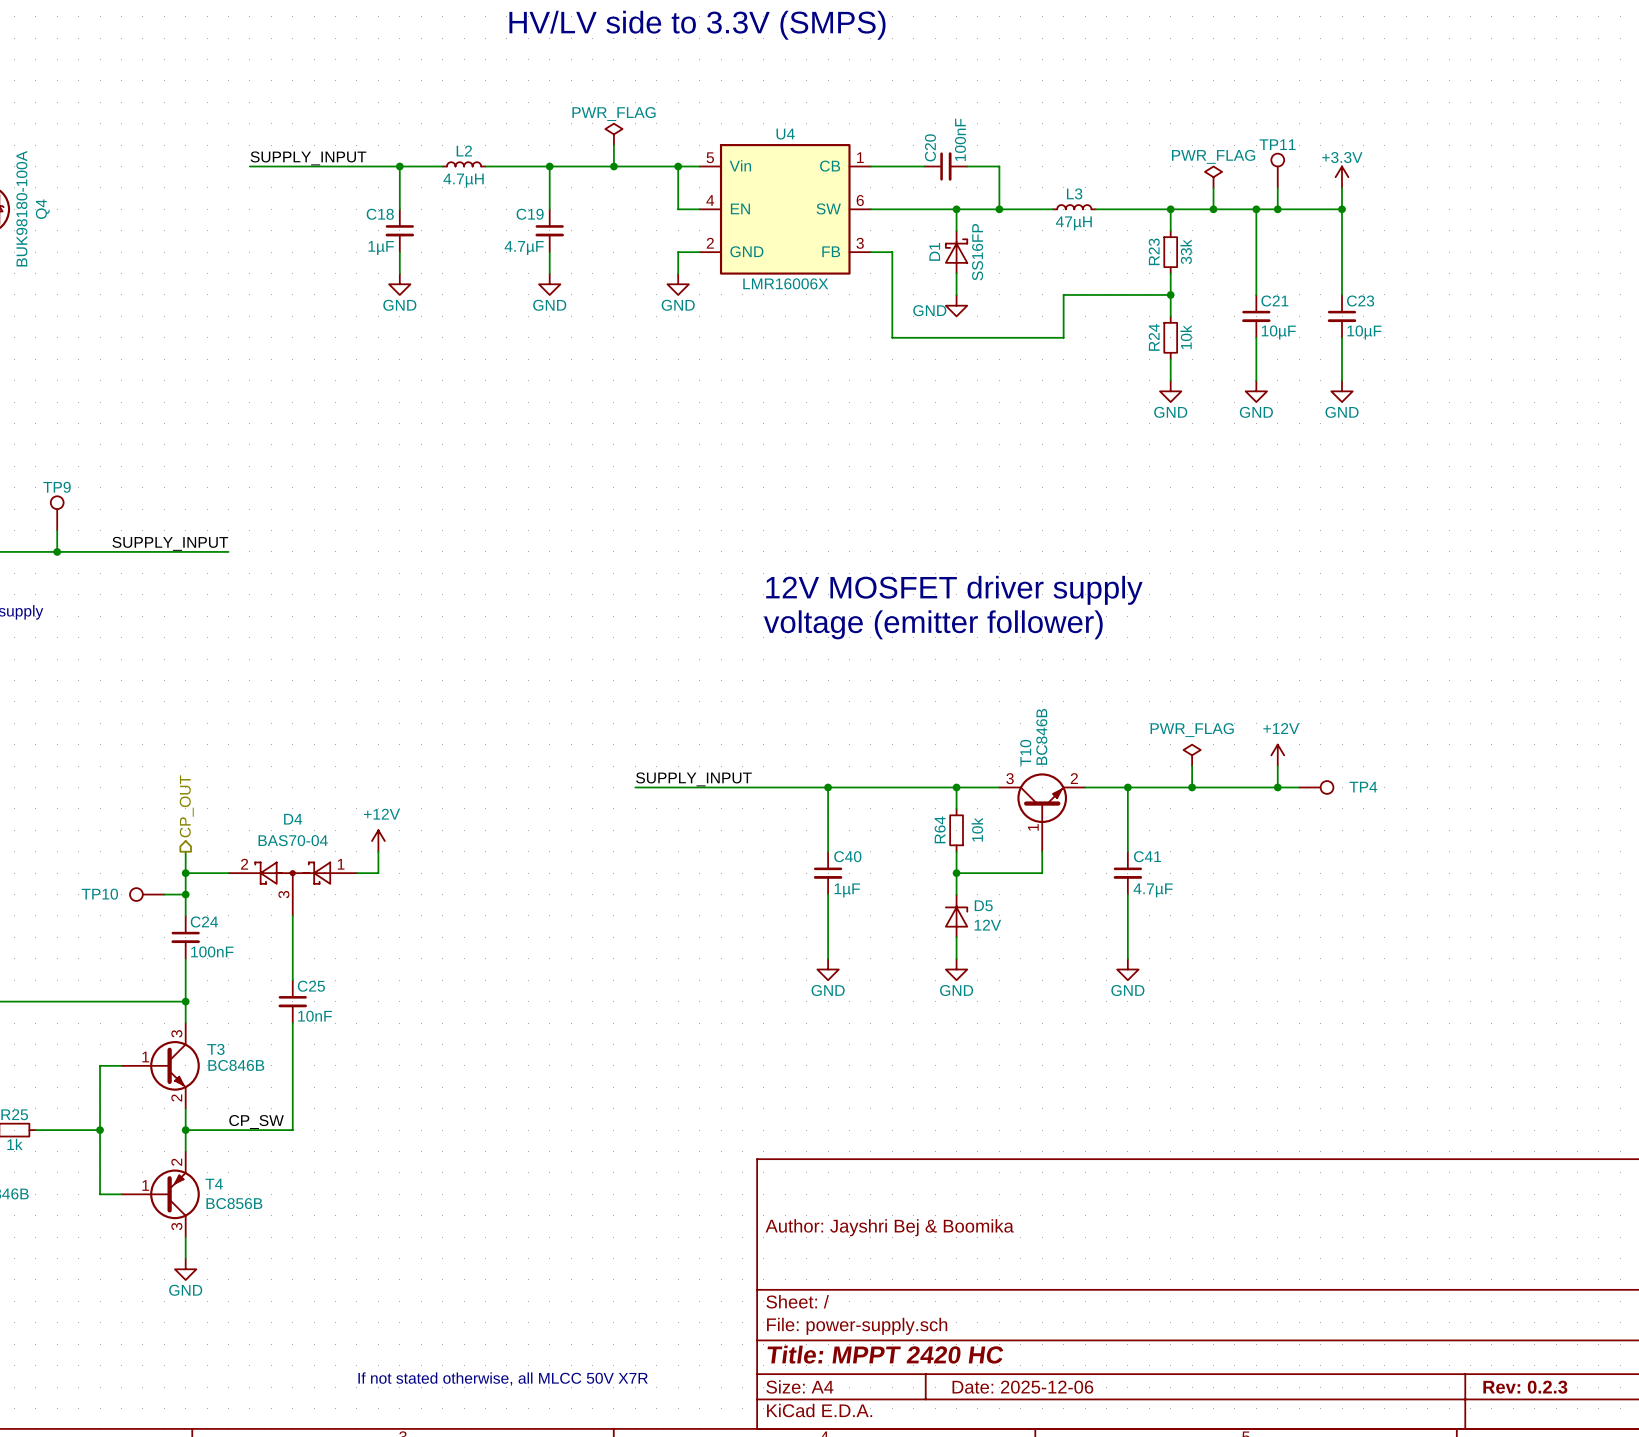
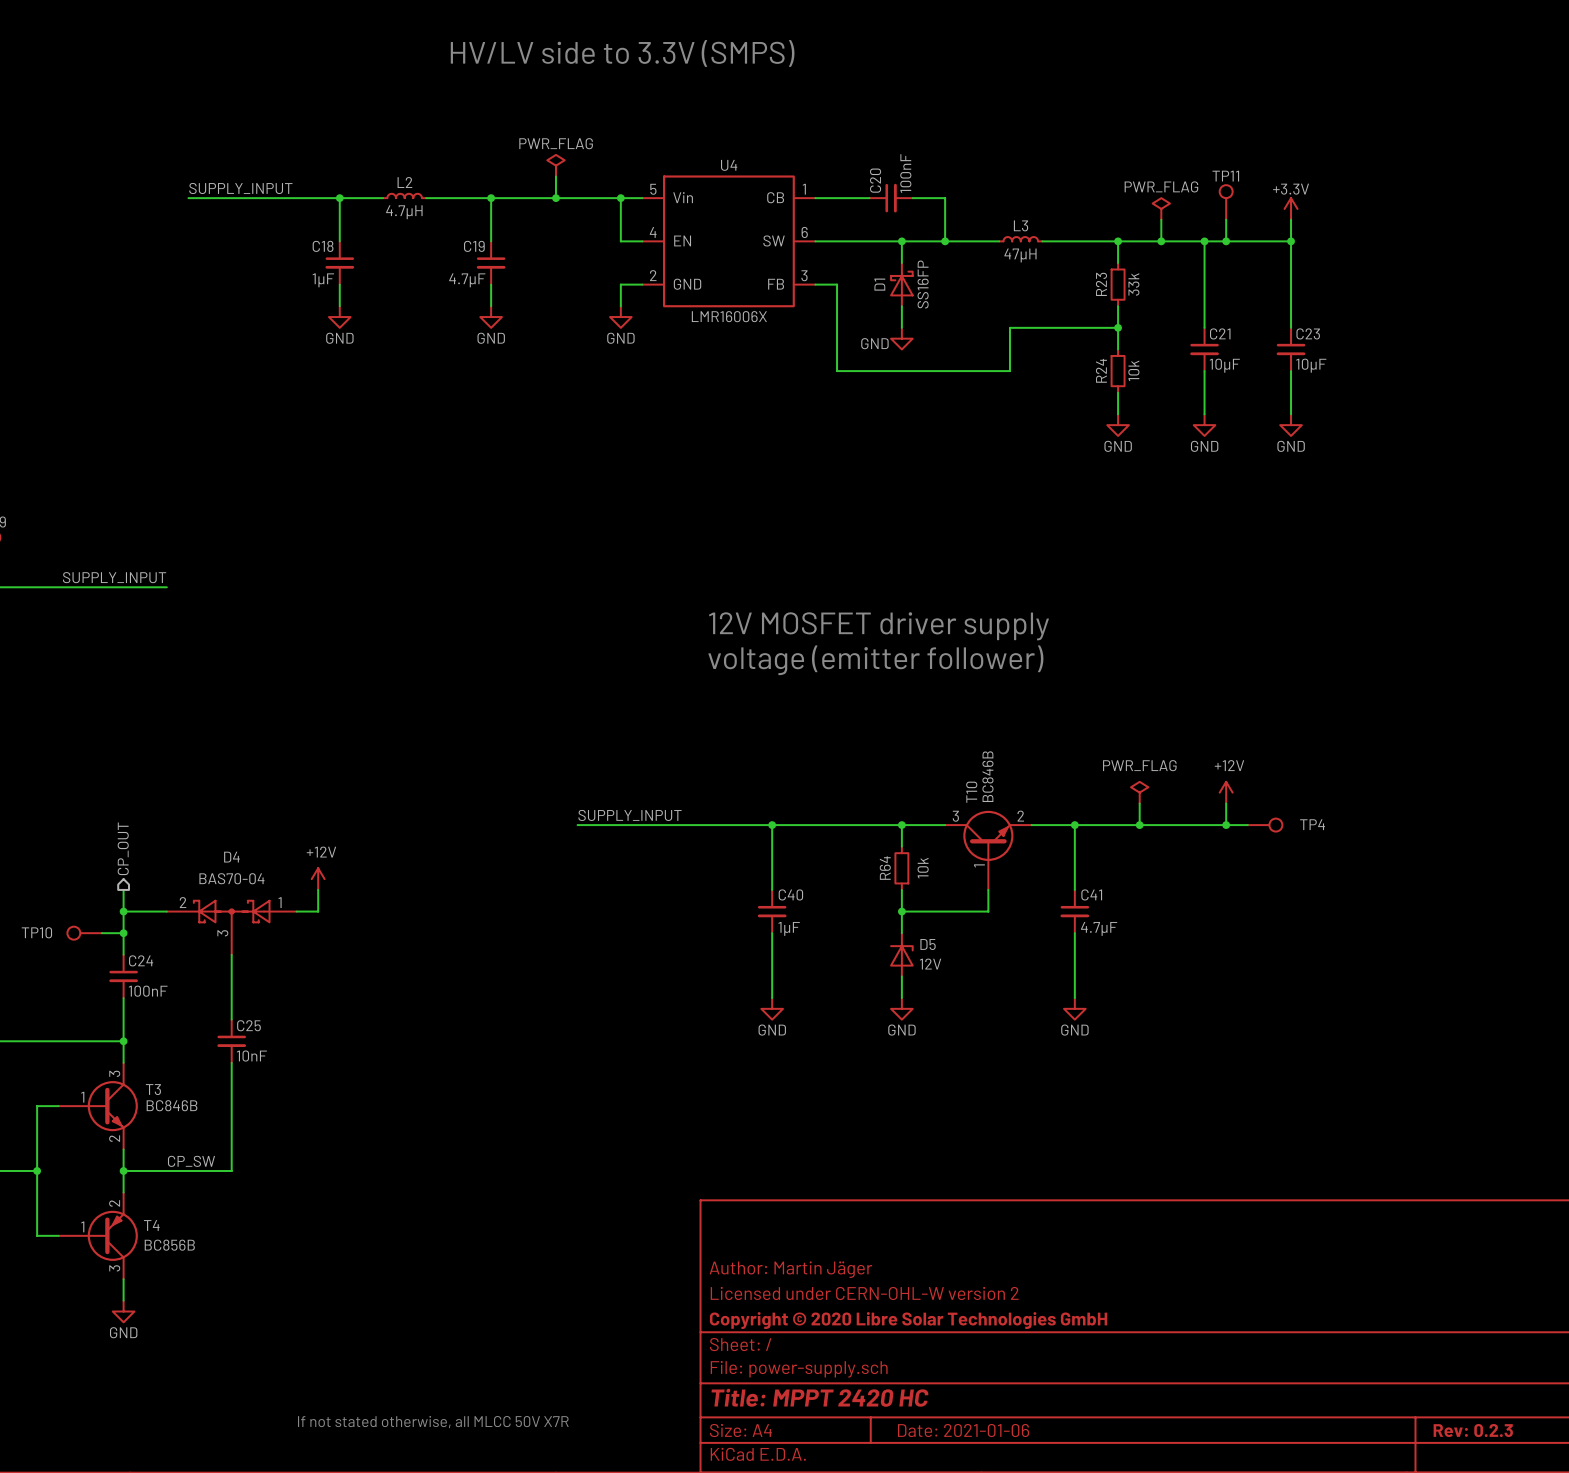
title block: Author: Jayshri Bej & Boomika (889, 1227) -> Author: Martin Jäger (790, 1269)
title block: none -> Licensed under CERN-OHL-W version 2 (864, 1293)
title block: none -> Copyright © 2020 Libre Solar Technologies GmbH (908, 1320)
title block: Date: 2025-12-06 (1022, 1387) -> Date: 2021-01-06 (963, 1430)

